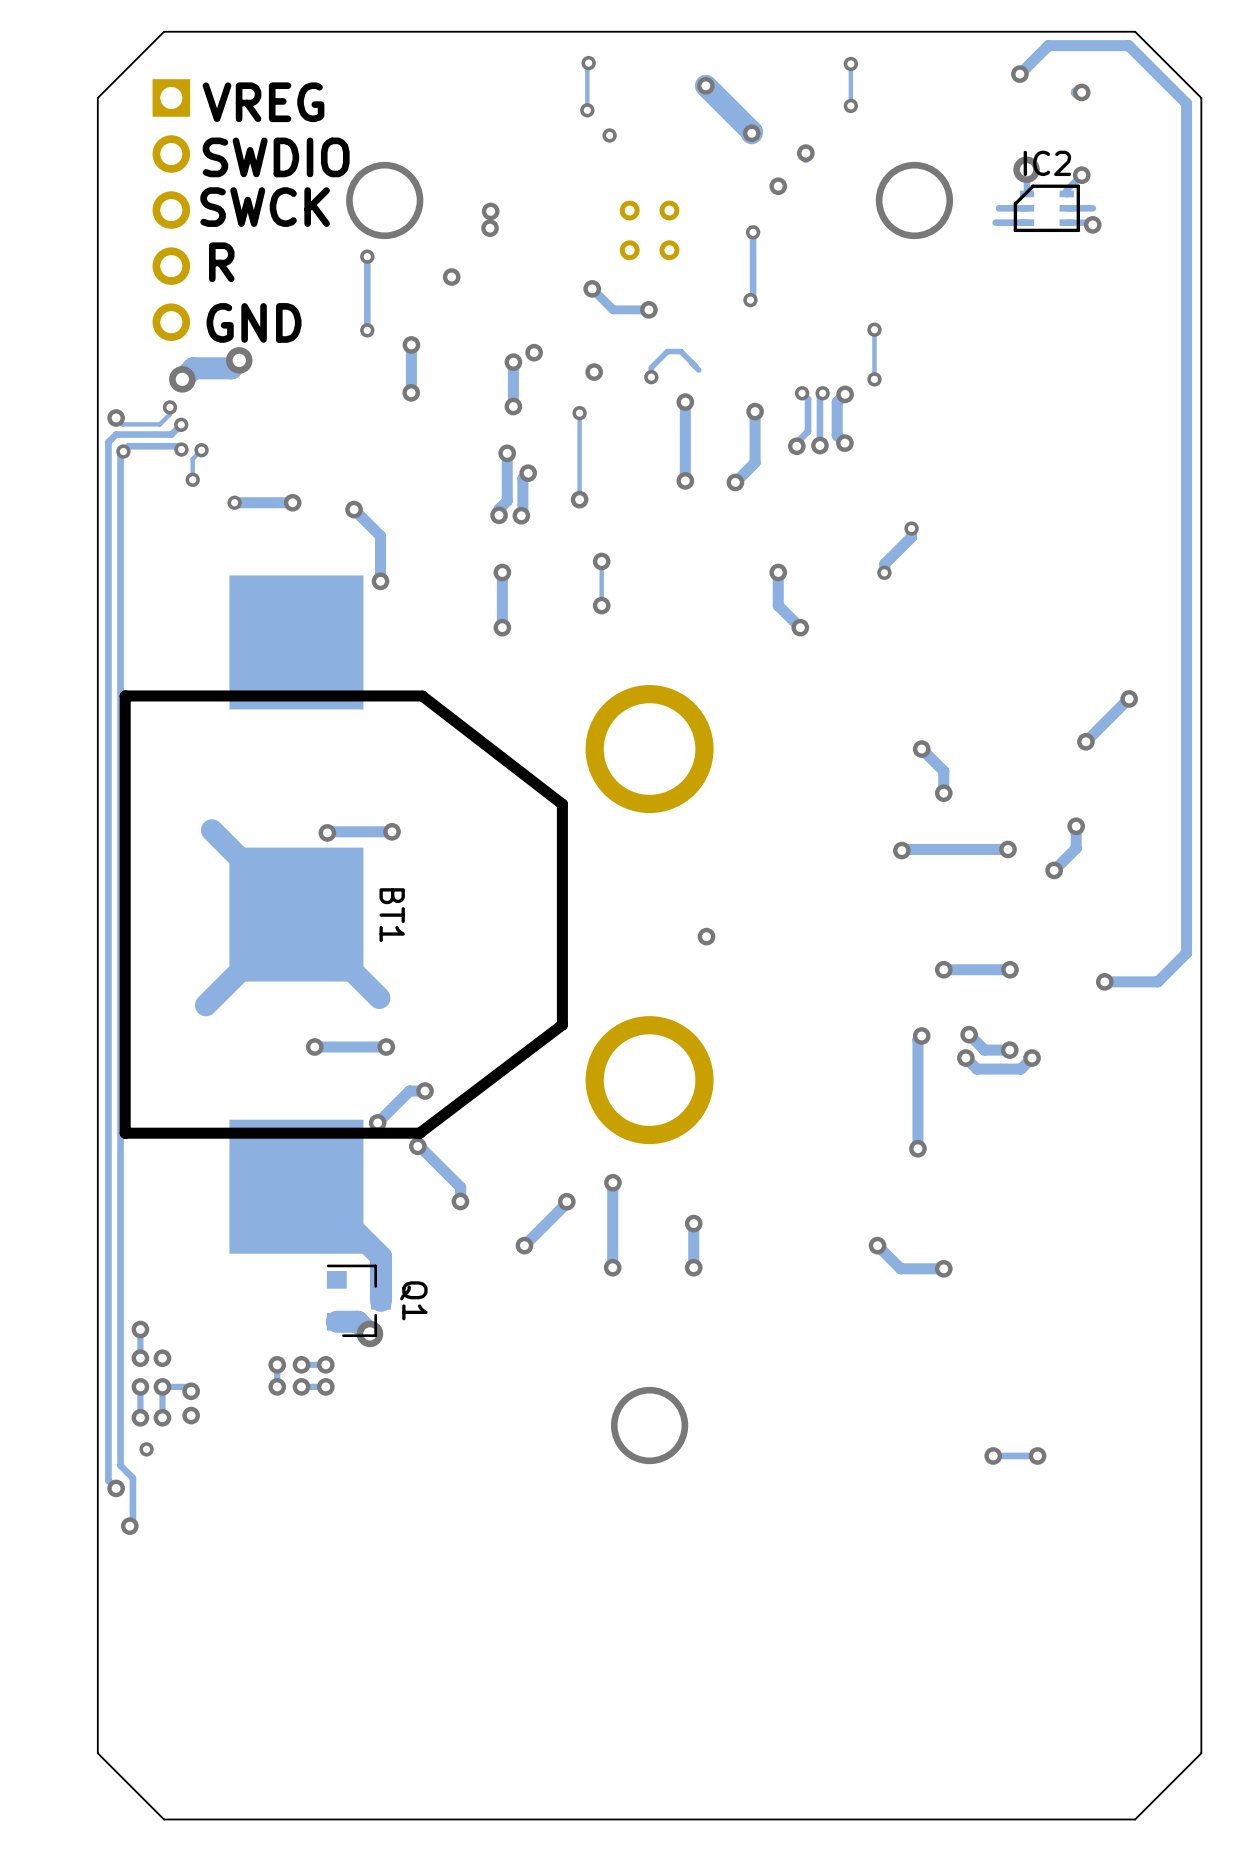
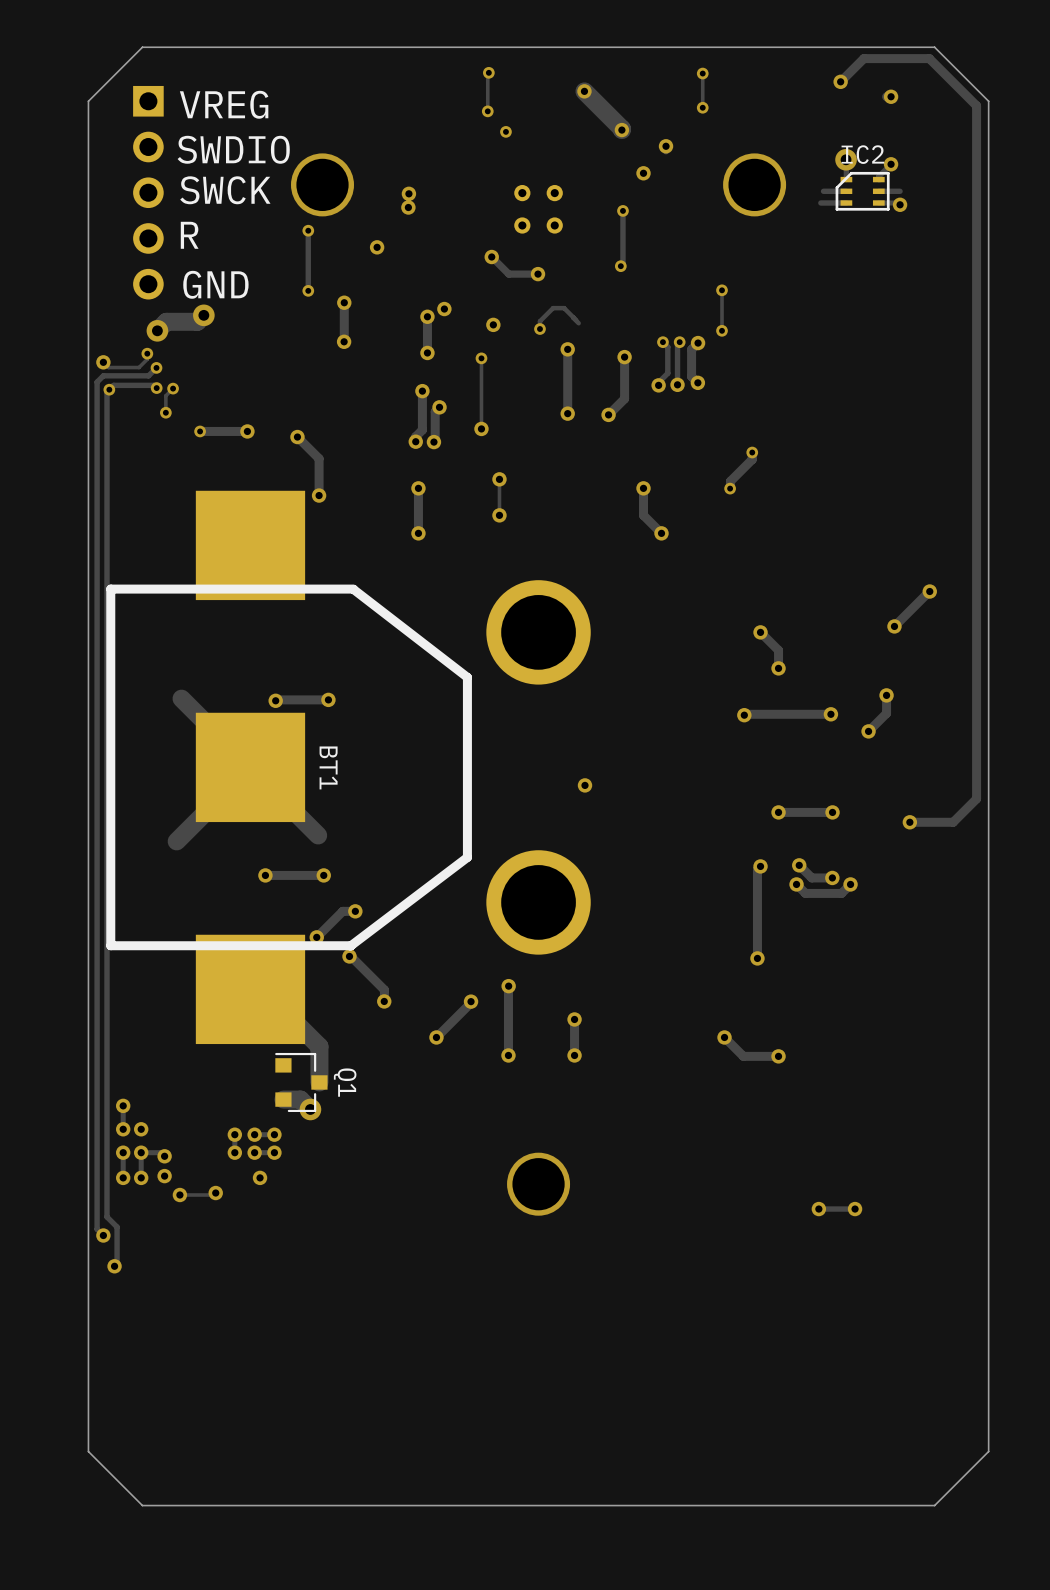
via: none -> (260, 1177)
track: none -> (215, 1193) (213, 1195) (179, 1195)
via: none -> (215, 1193)
via: none -> (179, 1195)
via: (146, 1449) -> none

